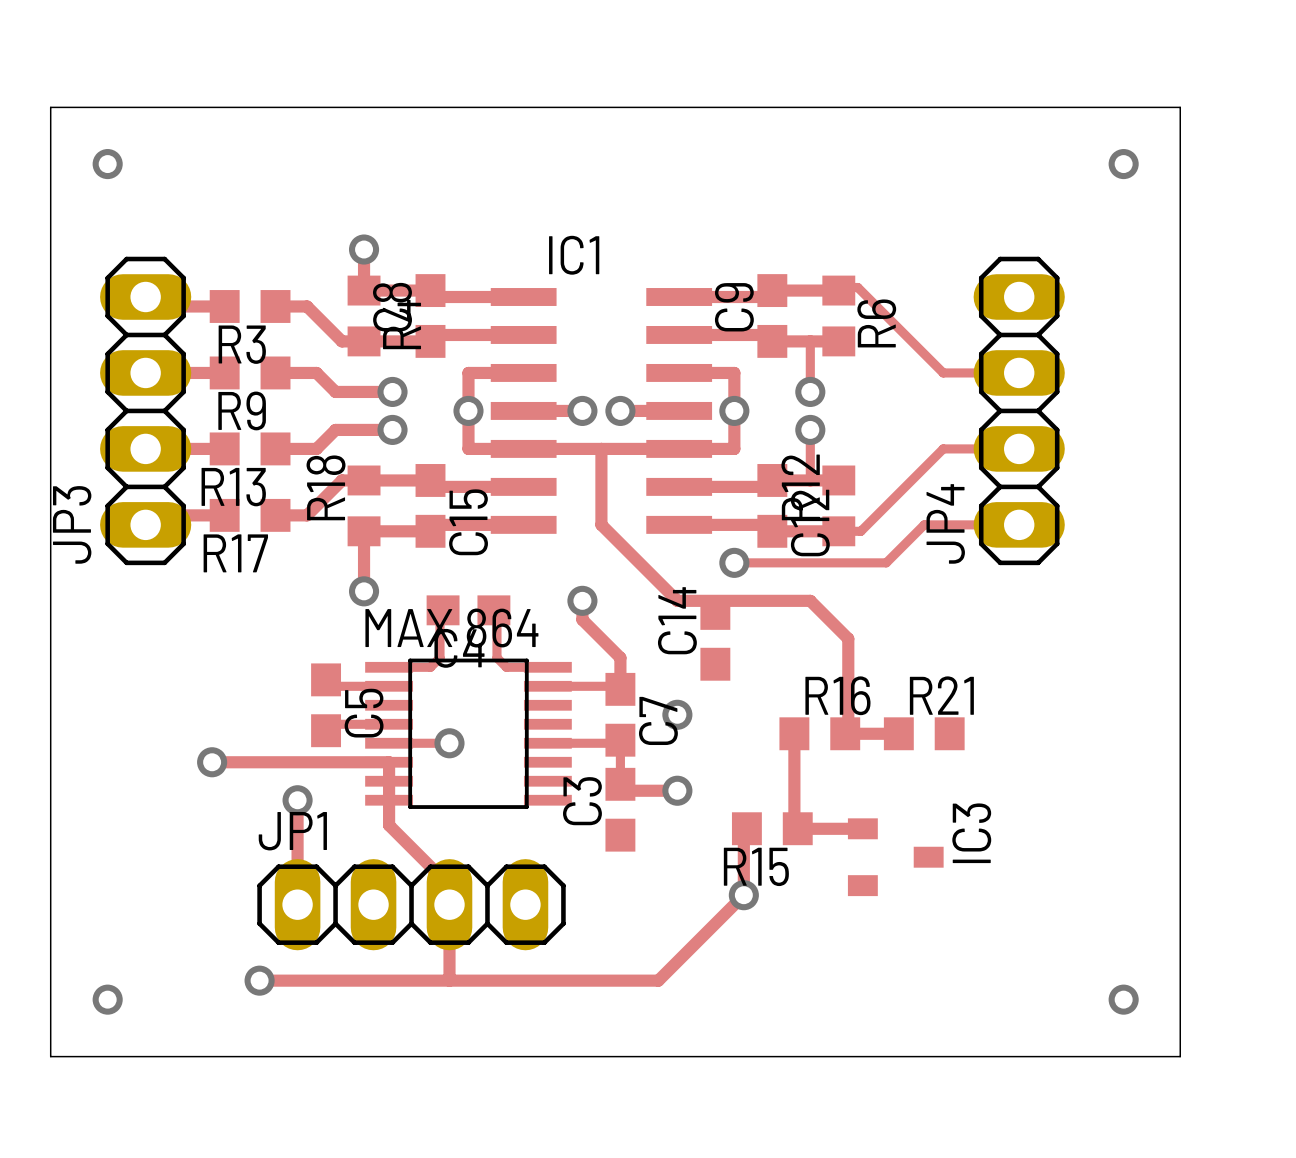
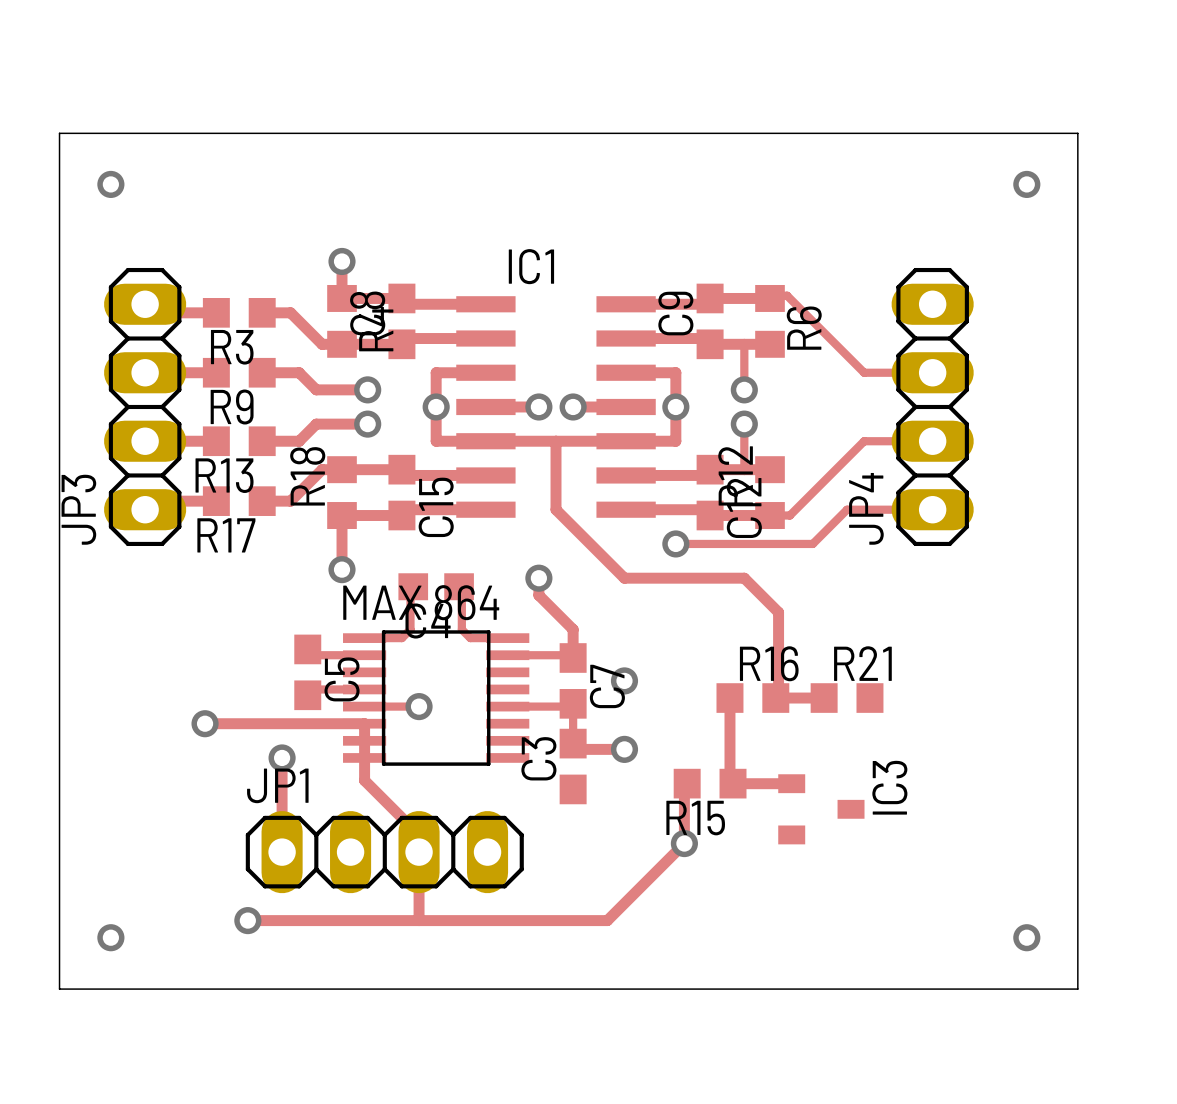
C14: (715, 638) -> none

